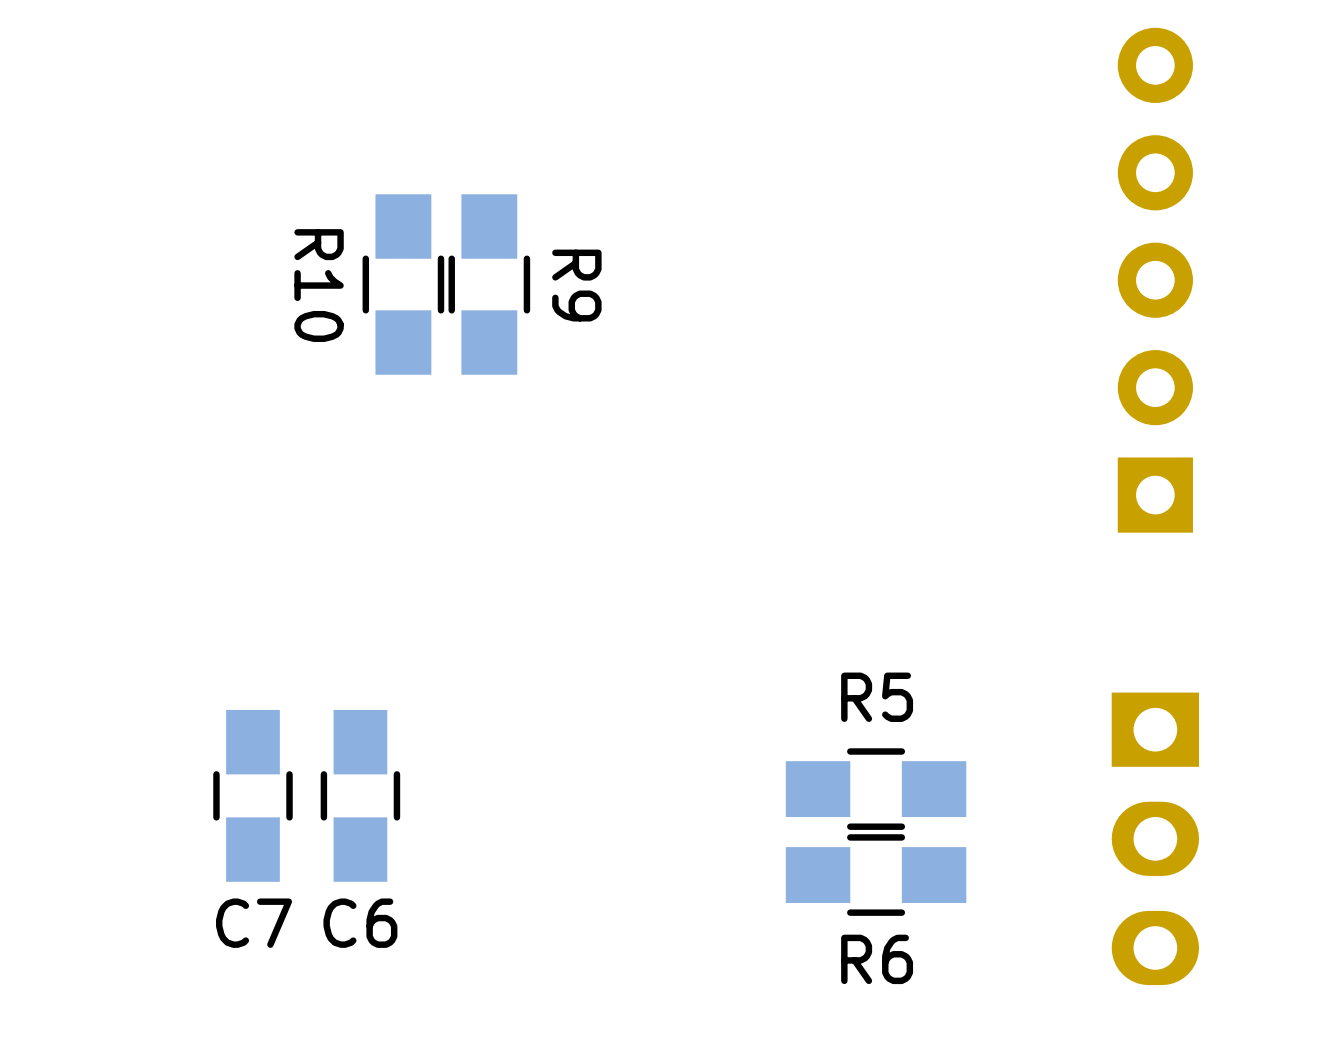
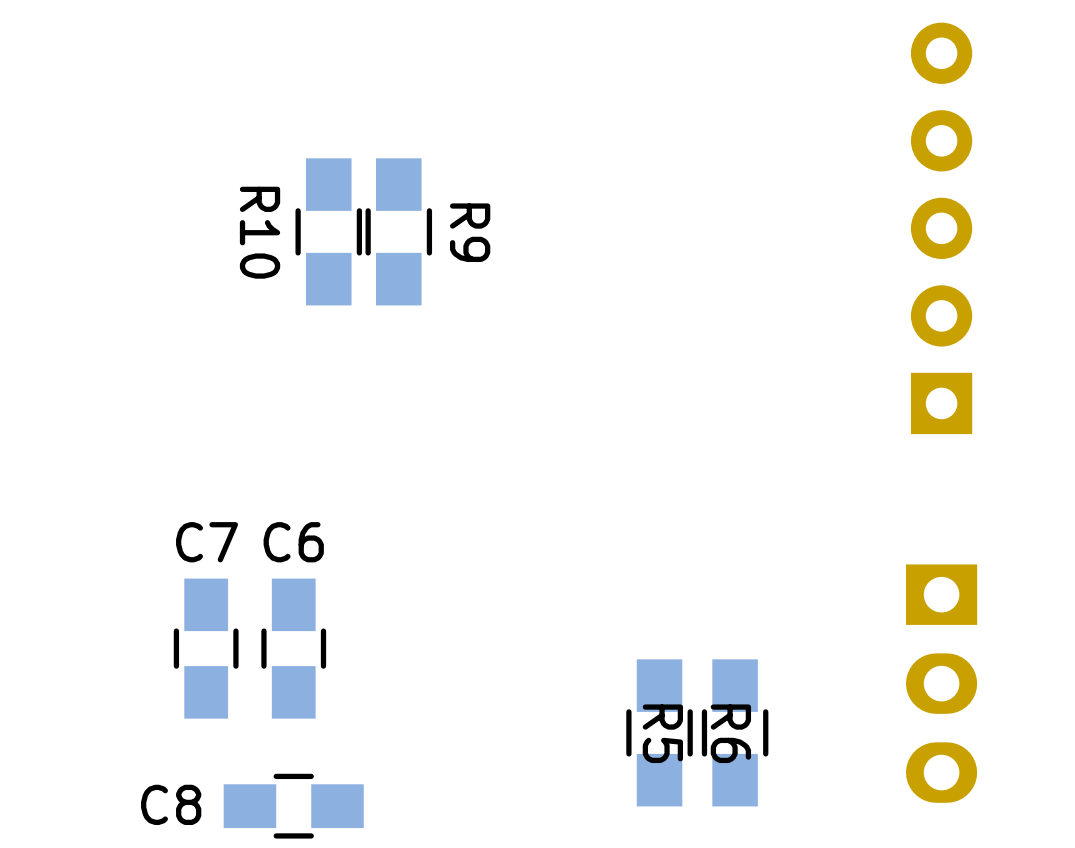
R5 name position: R5 (877, 697) -> R5 (662, 733)
R5 rotation: 0° (876, 789) -> 90° clockwise (735, 732)
R5 position: (876, 789) -> (735, 732)
R6 rotation: 0° (876, 875) -> 90° clockwise (659, 732)
C7 name position: C7 (254, 923) -> C7 (207, 542)
C6 name position: C6 (360, 923) -> C6 (293, 542)
R6 name position: R6 (877, 959) -> R6 (730, 733)
C8: none -> (293, 806)

